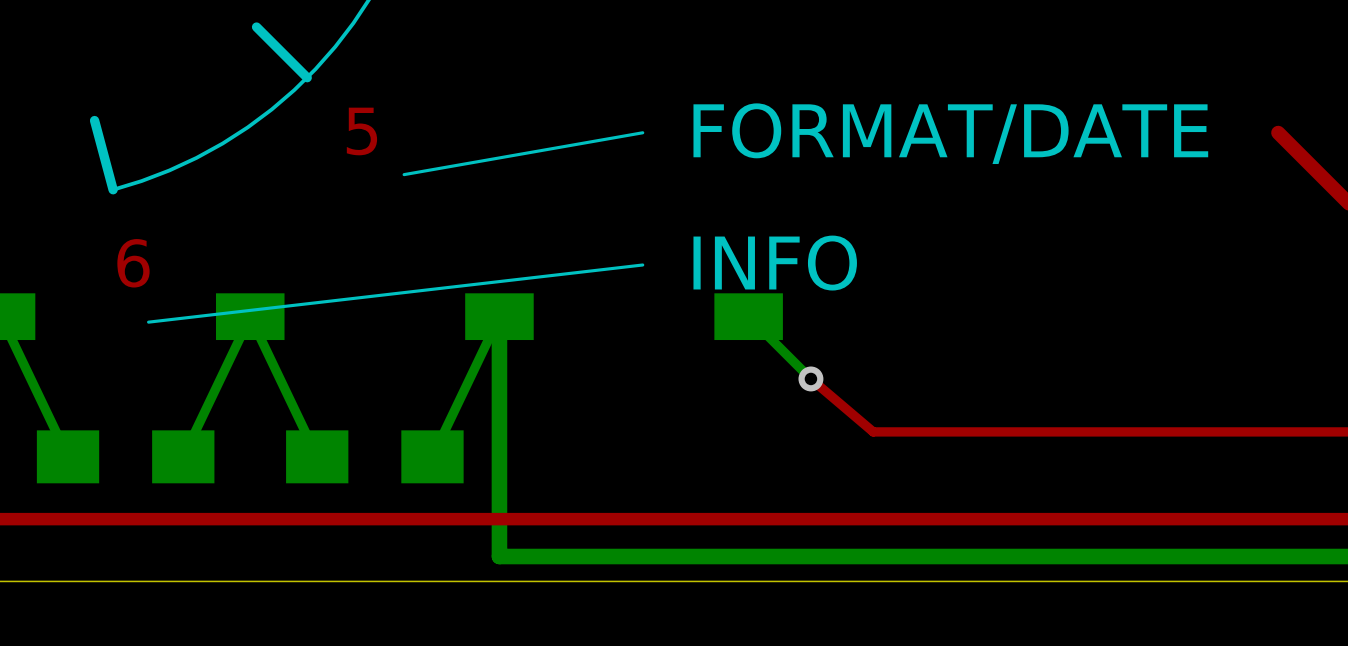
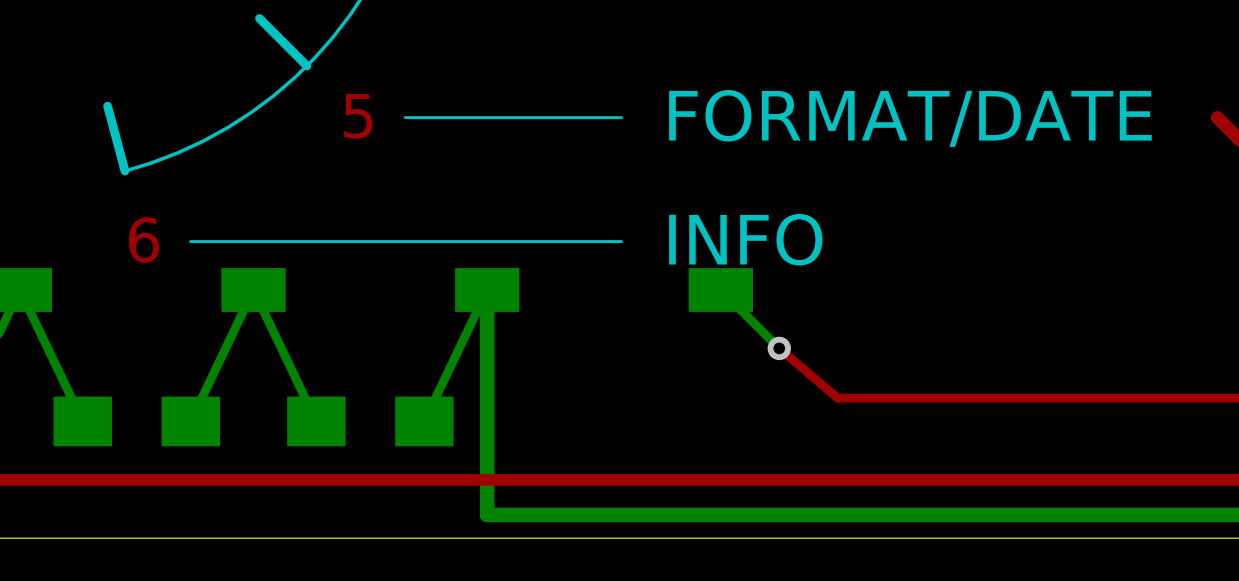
line: (642, 132) (404, 174) -> (621, 117) (405, 117)
line: (642, 264) (148, 322) -> (621, 241) (190, 241)

